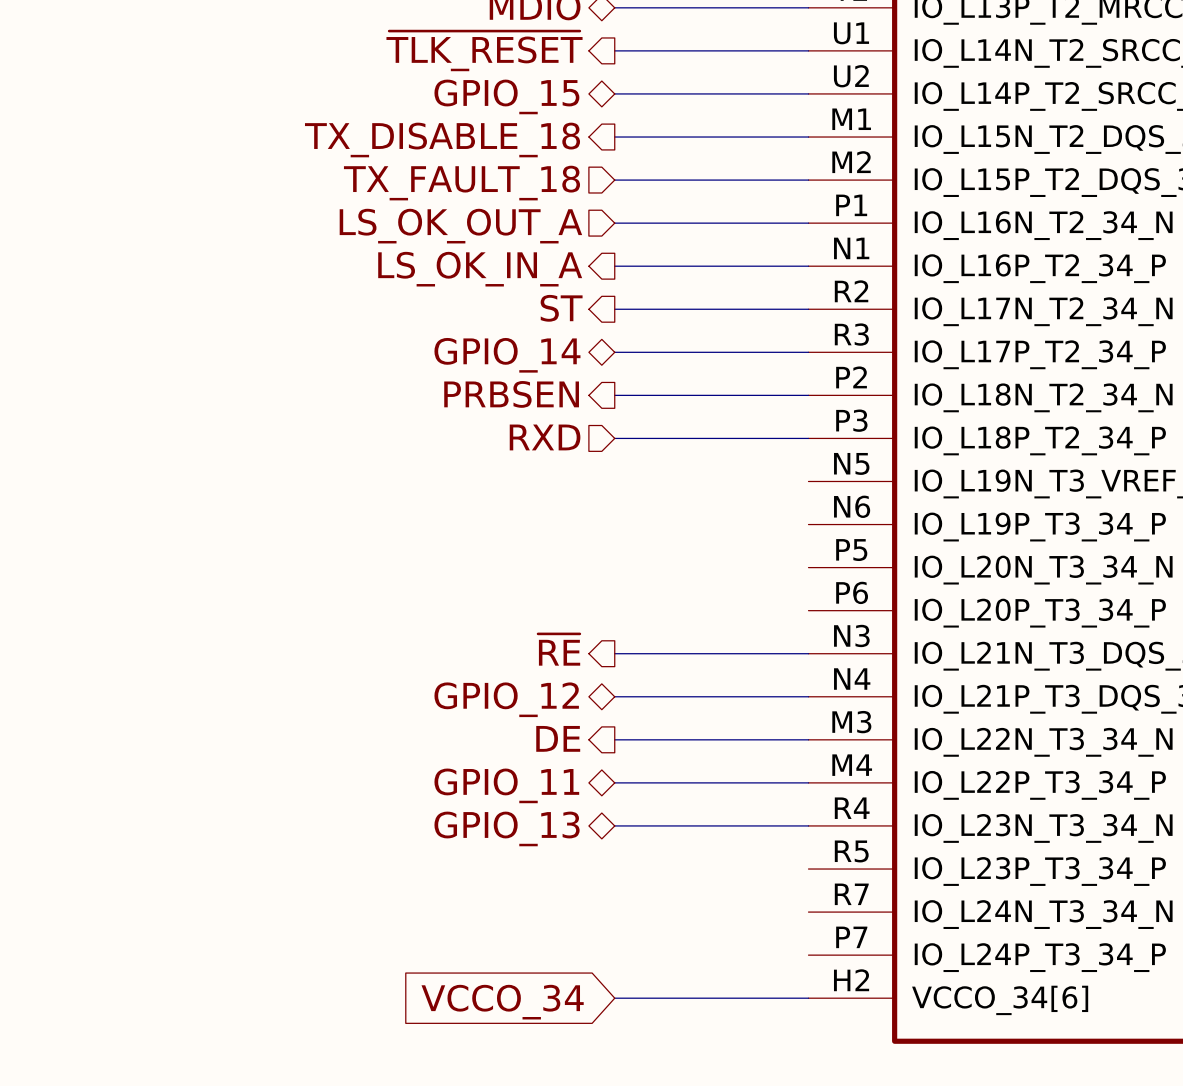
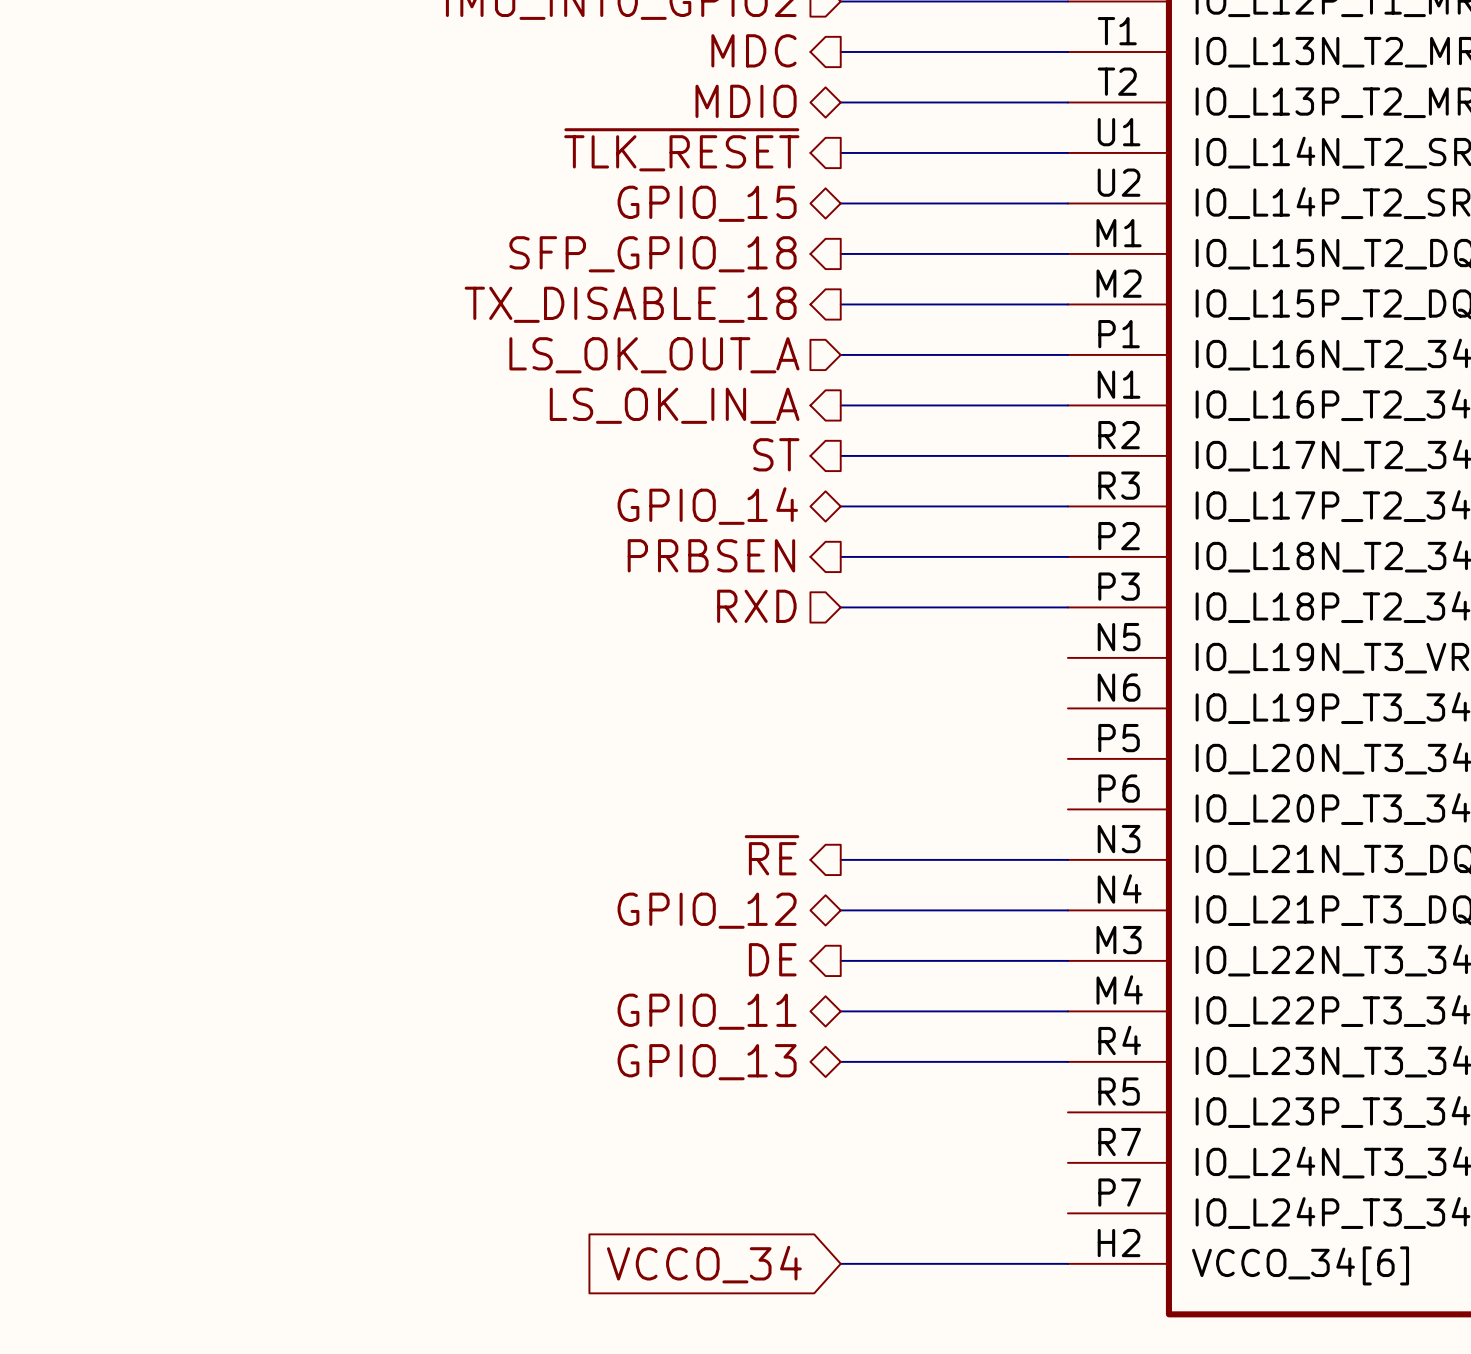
hierarchical label: TX_DISABLE_18 (442, 139) -> SFP_GPIO_18 (652, 254)
hierarchical label shape: input (461, 183) -> output (630, 304)
hierarchical label: TX_FAULT_18 (461, 183) -> TX_DISABLE_18 (630, 304)

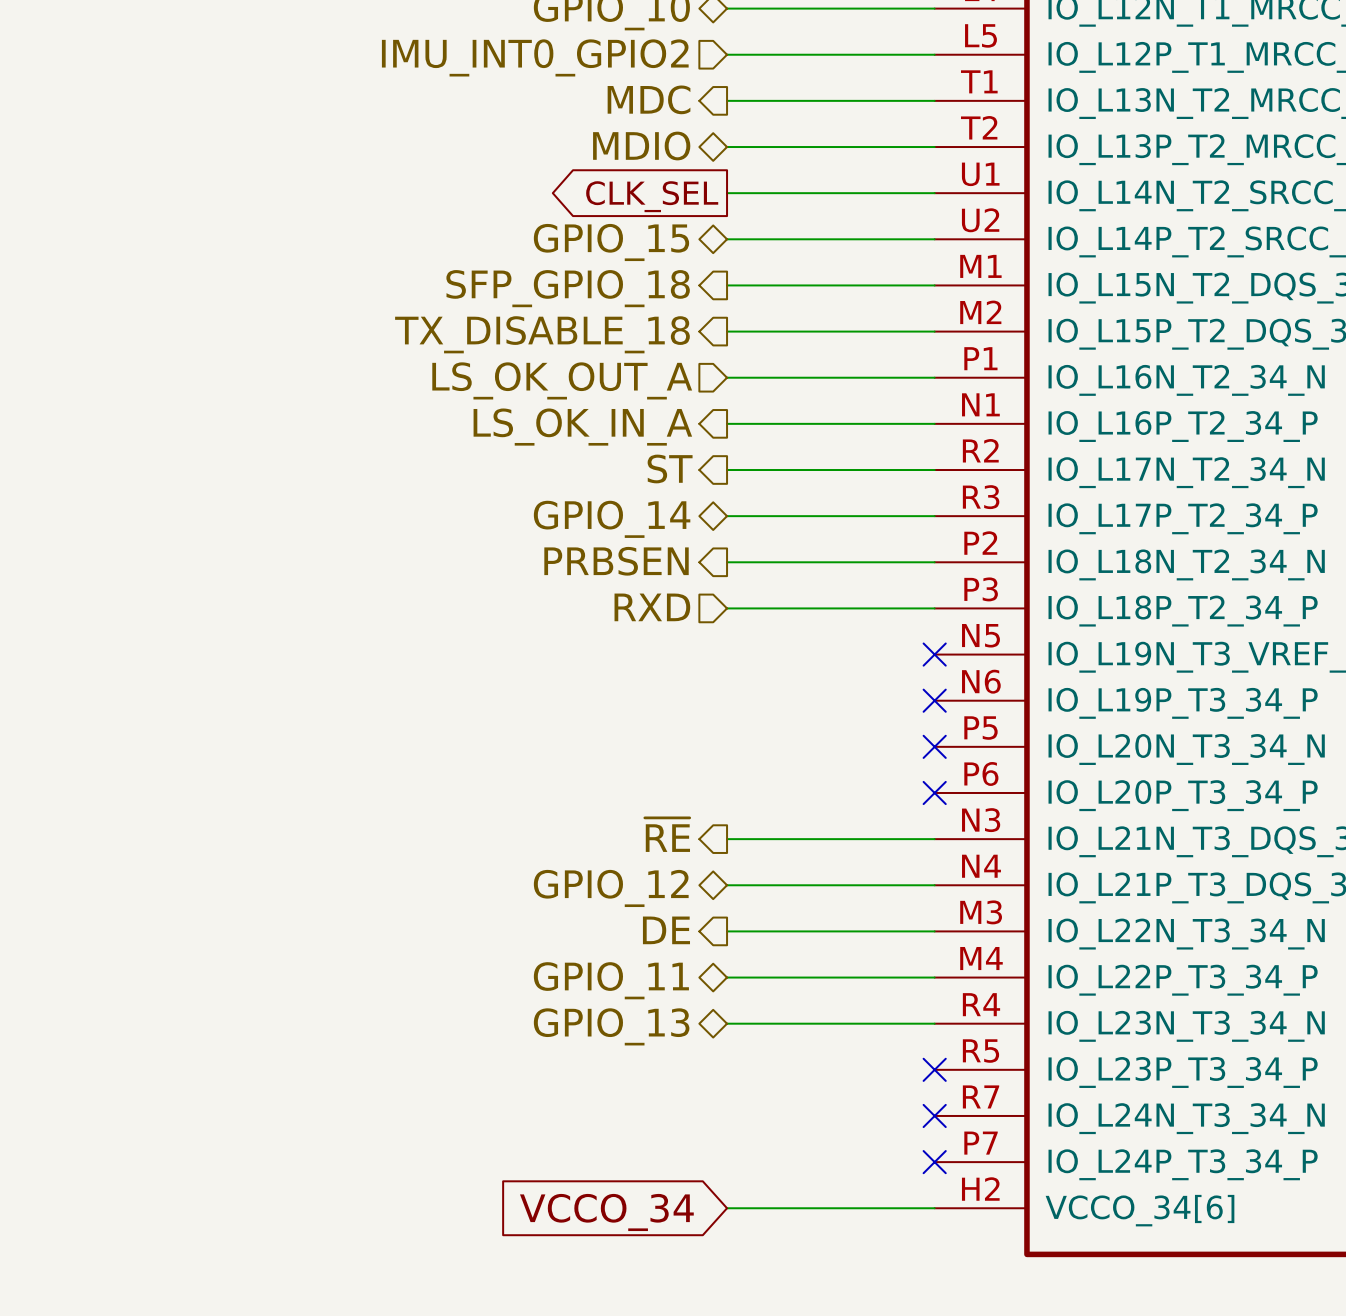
hierarchical label: ~{TLK_RESET} (681, 149) -> none
global label: none -> CLK_SEL (652, 196)
no-connect mark: none -> (934, 654)
no-connect mark: none -> (934, 700)
no-connect mark: none -> (934, 746)
no-connect mark: none -> (934, 792)
no-connect mark: none -> (934, 1069)
no-connect mark: none -> (934, 1115)
no-connect mark: none -> (934, 1162)

